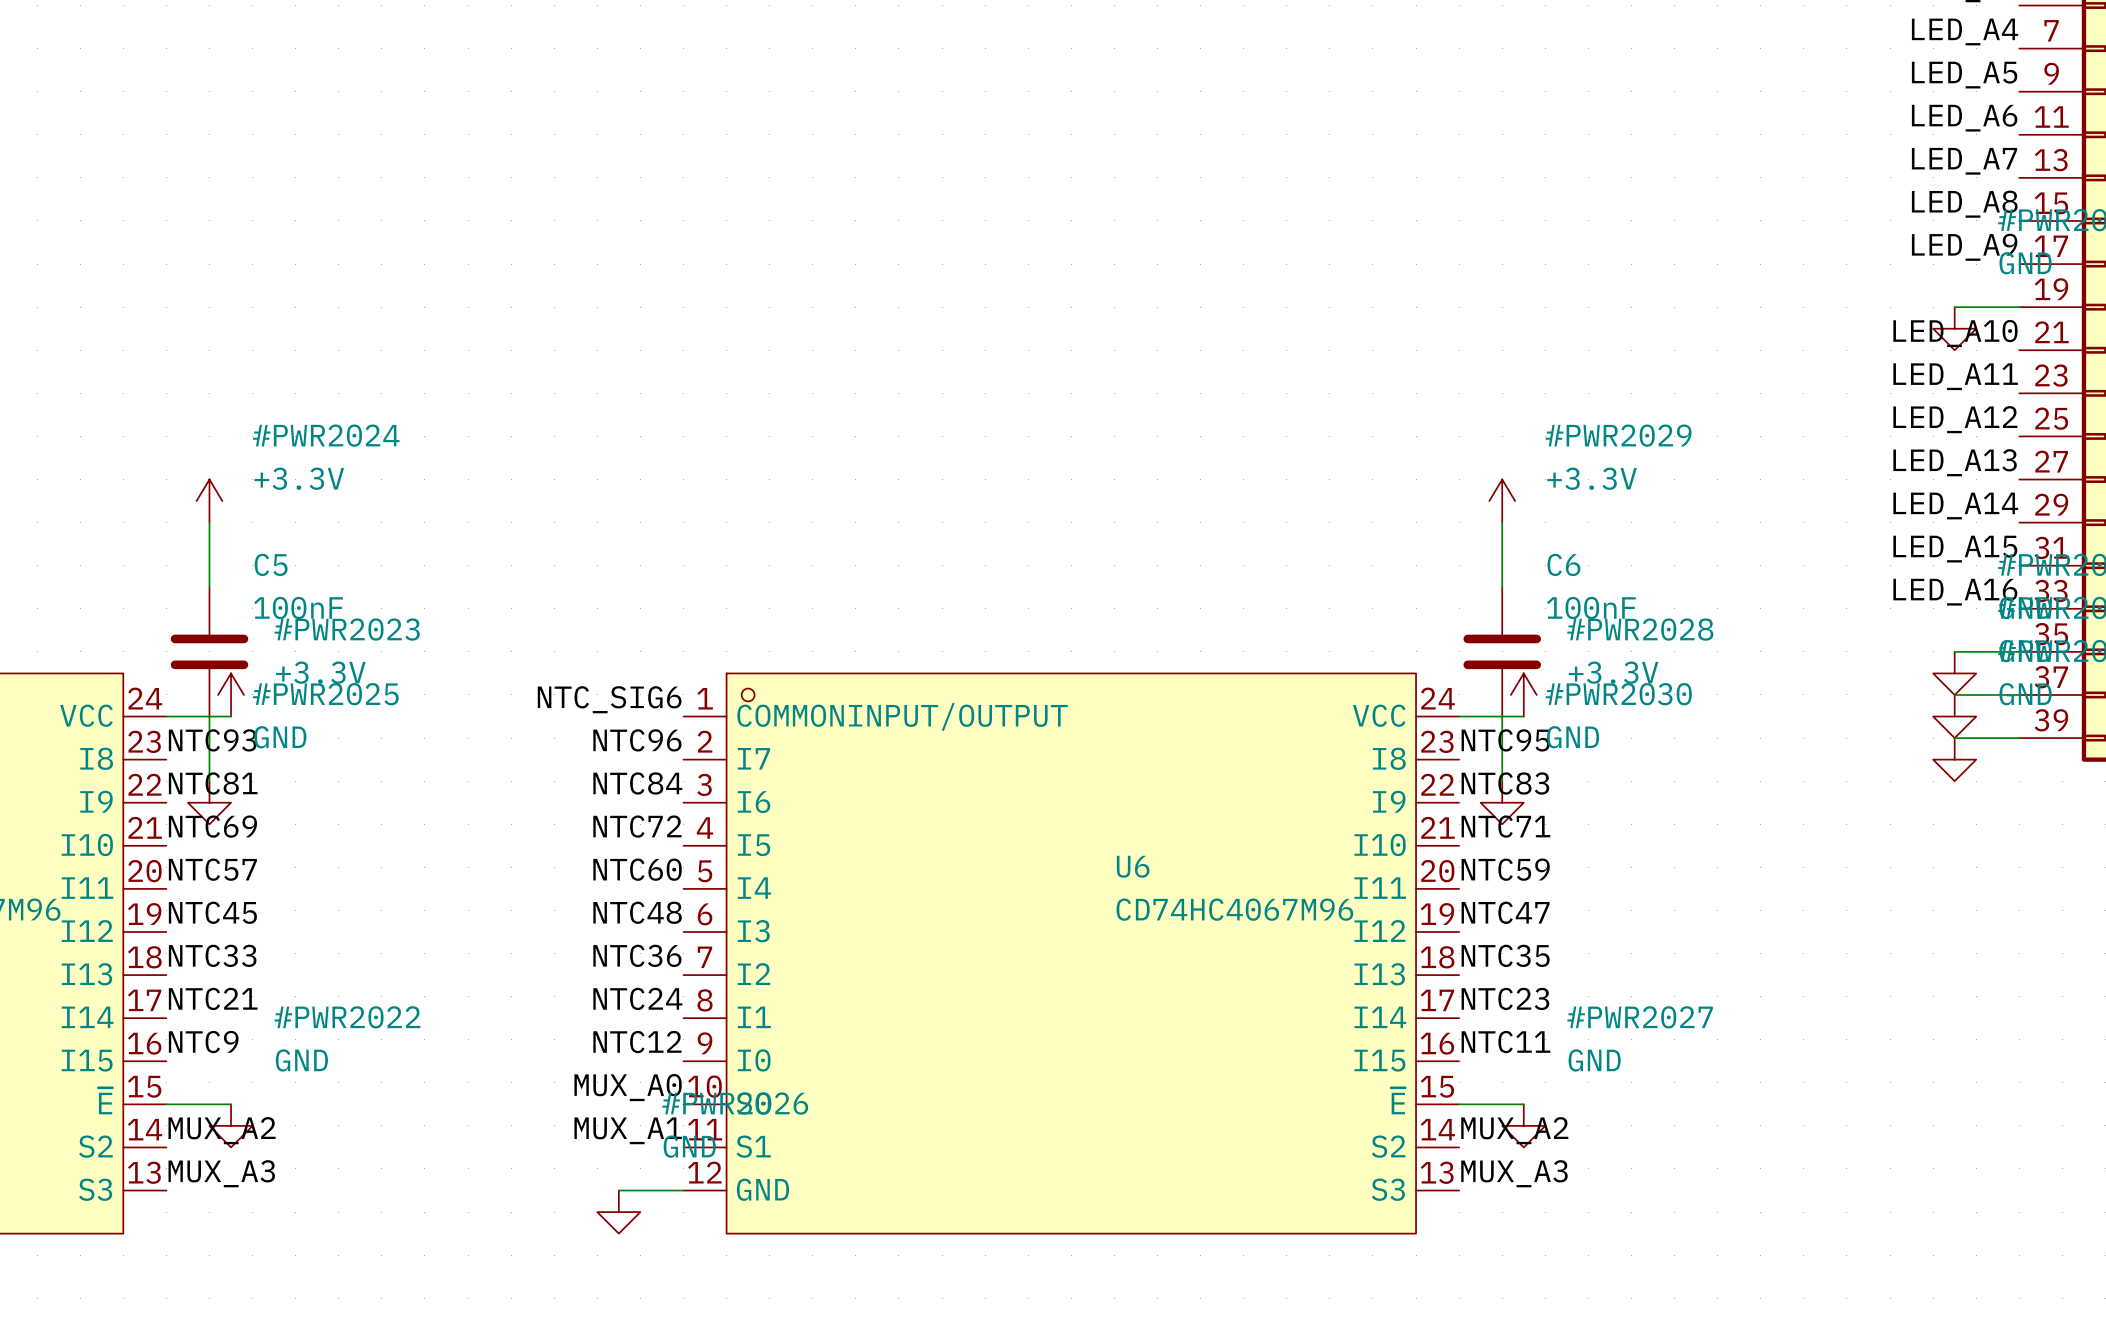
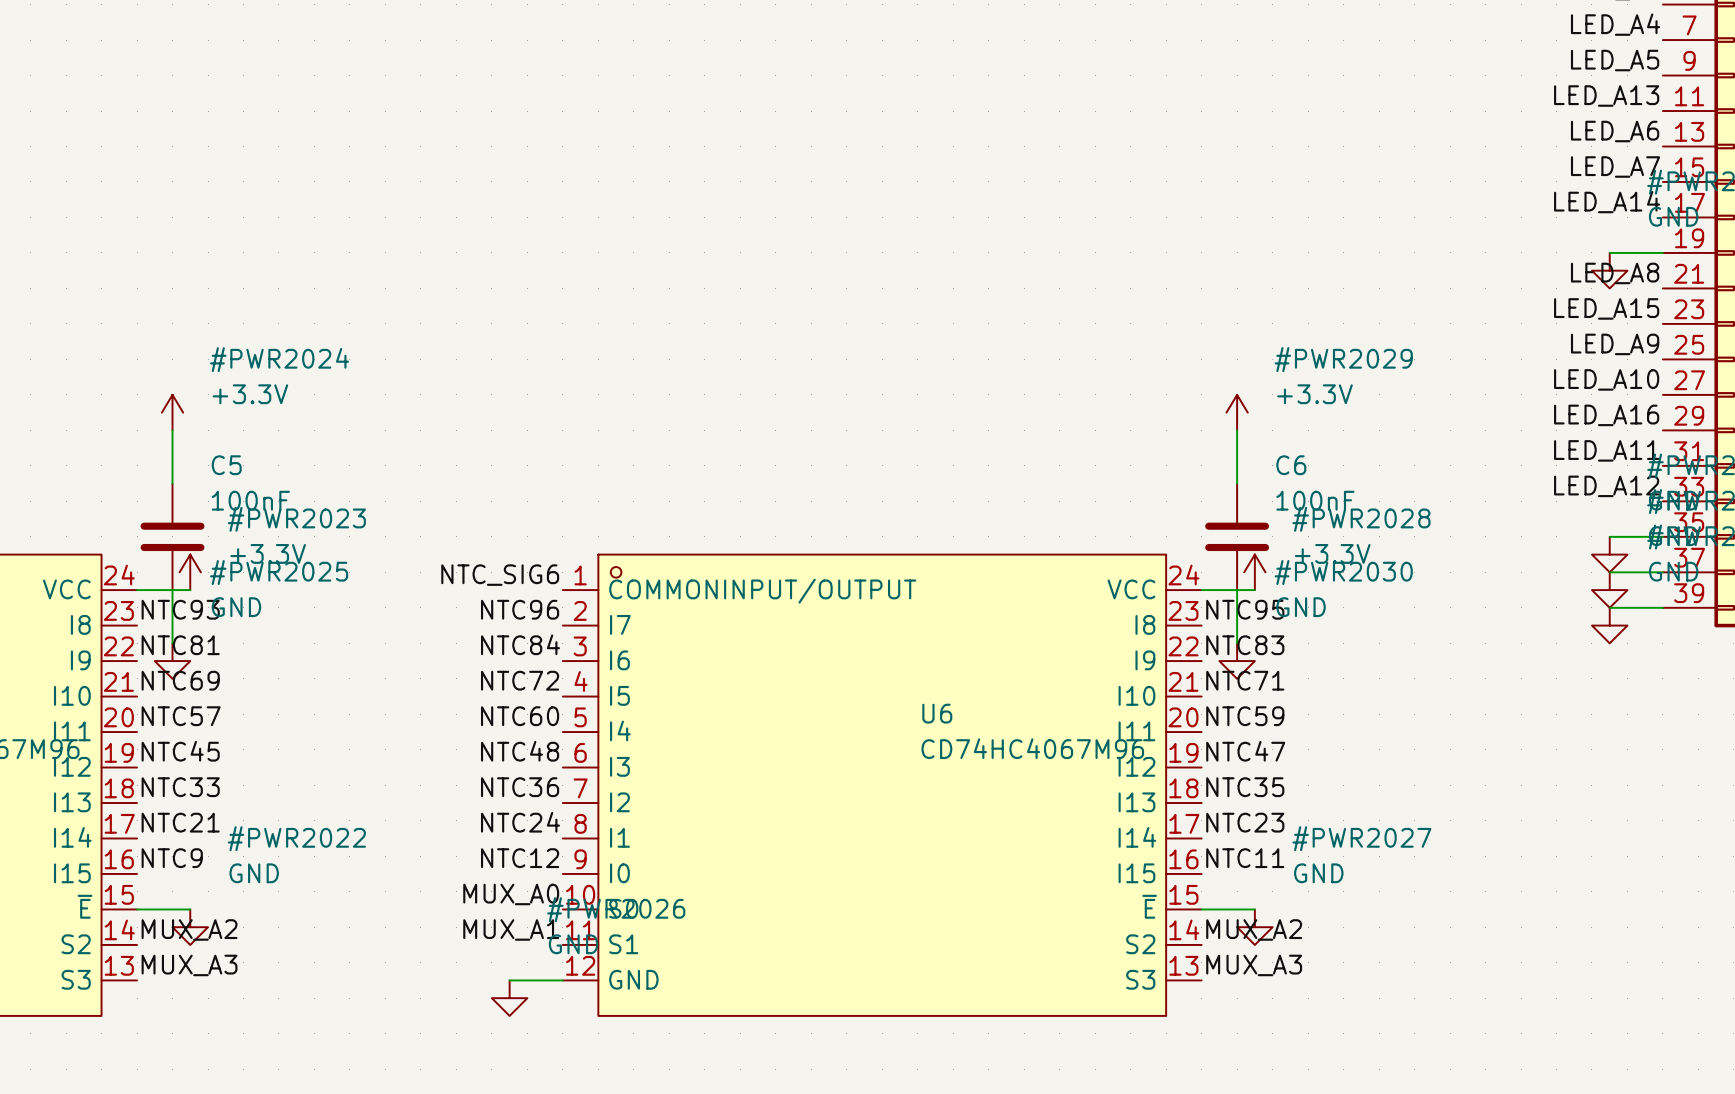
label: LED_A6 (1964, 118) -> LED_A13 (1606, 96)
label: LED_A7 (1964, 161) -> LED_A6 (1615, 131)
label: LED_A8 (1964, 204) -> LED_A7 (1615, 166)
label: LED_A9 (1964, 247) -> LED_A14 (1607, 202)
label: LED_A10 (1955, 333) -> LED_A8 (1615, 273)
label: LED_A11 (1955, 376) -> LED_A15 (1606, 308)
label: LED_A12 (1955, 419) -> LED_A9 (1615, 344)
label: LED_A13 (1955, 462) -> LED_A10 (1606, 379)
label: LED_A14 (1955, 506) -> LED_A16 (1606, 415)
label: LED_A15 (1955, 549) -> LED_A11 (1606, 450)
label: LED_A16 (1955, 592) -> LED_A12 (1606, 486)

